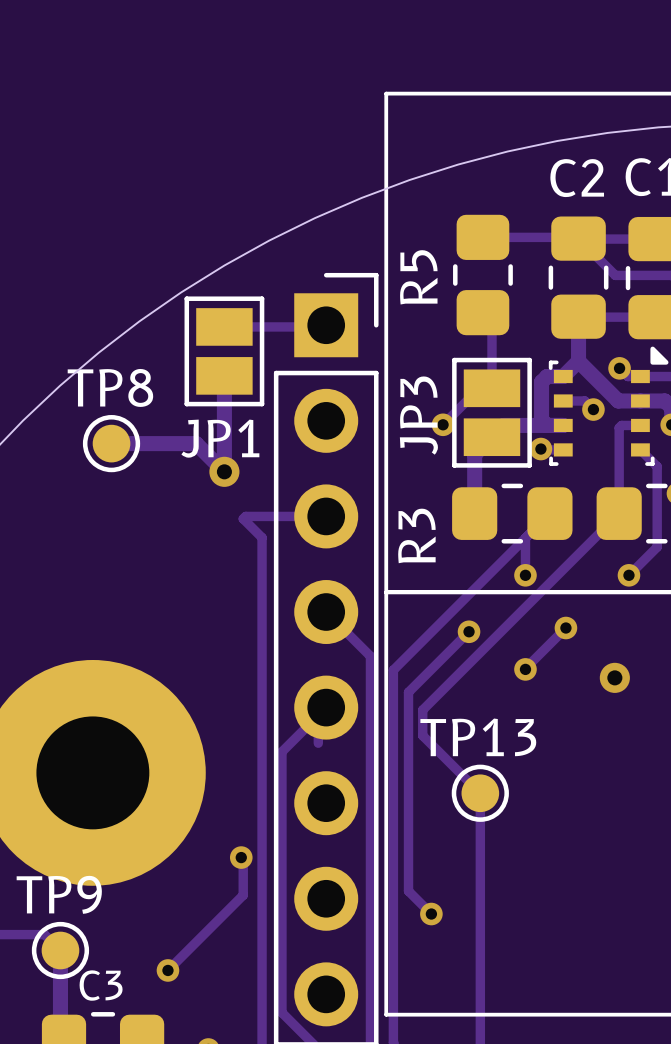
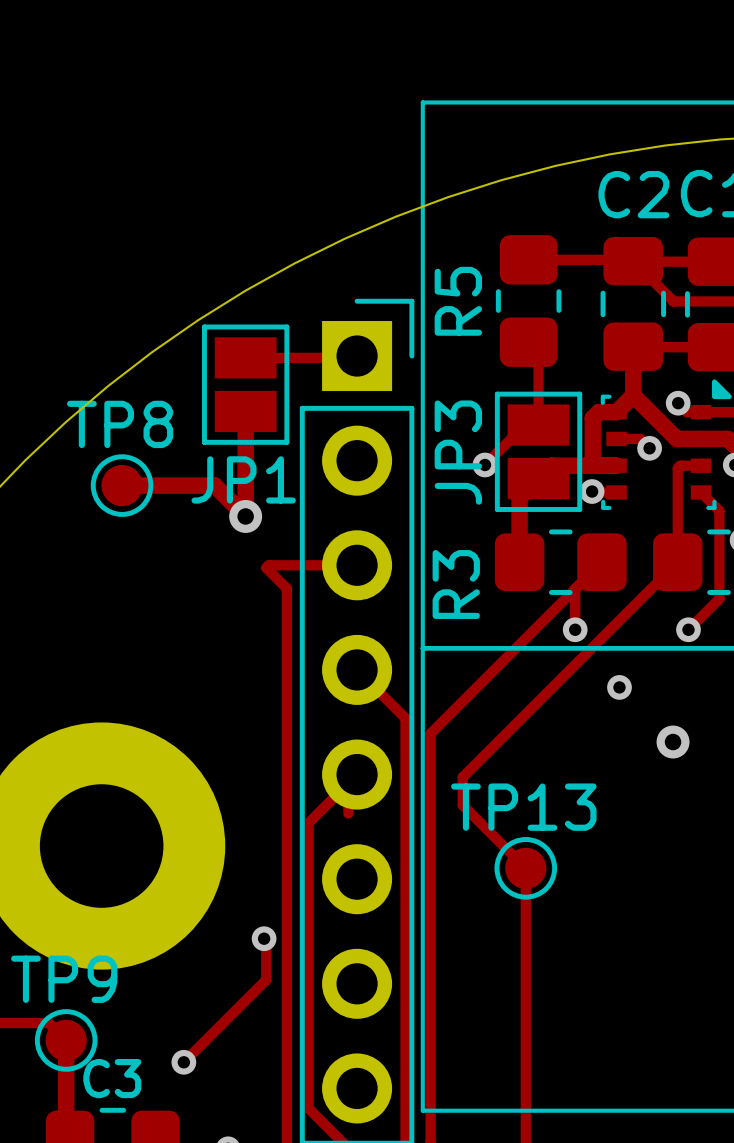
track: (565, 628) (525, 669) -> none
track: (469, 631) (408, 692) (408, 891) (431, 914) -> none
via: (469, 631) -> none
via: (525, 669) -> none
via: (431, 914) -> none

